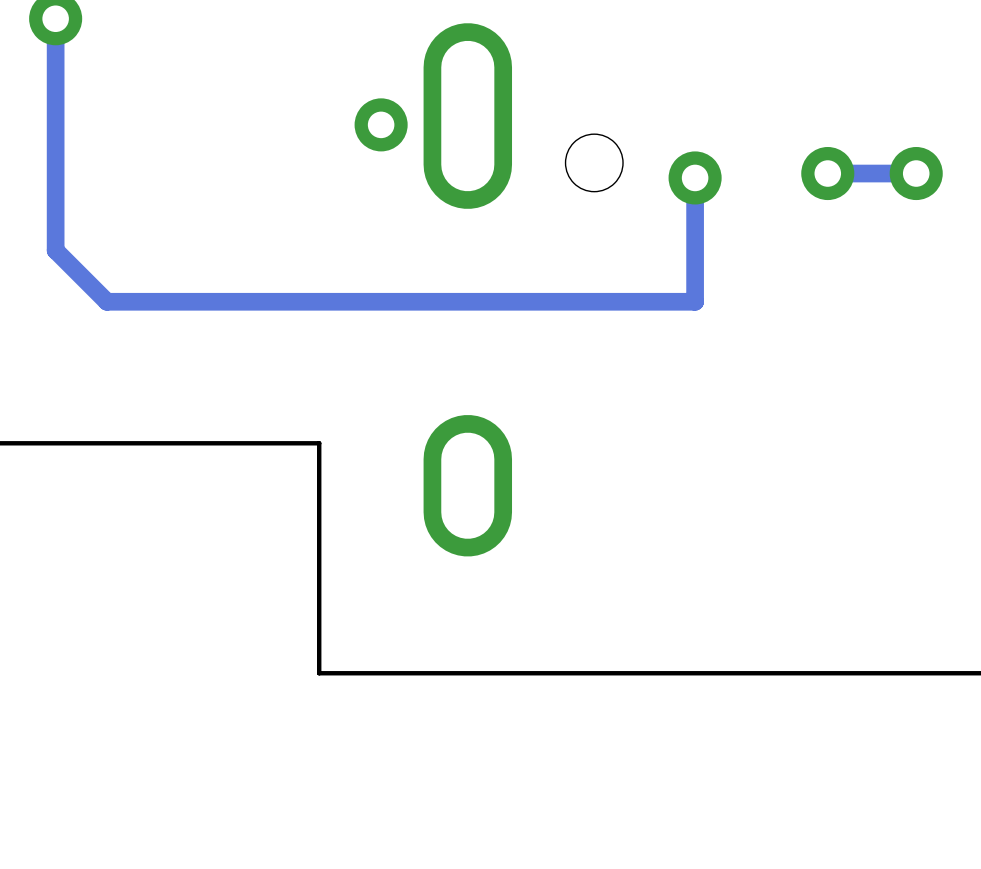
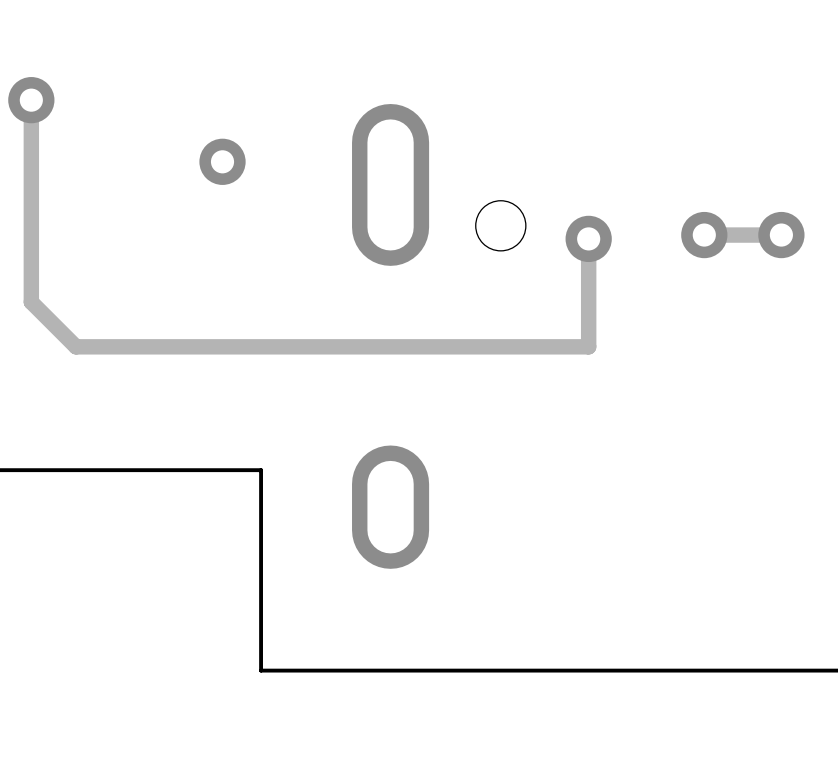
via position: (381, 124) -> (222, 161)

